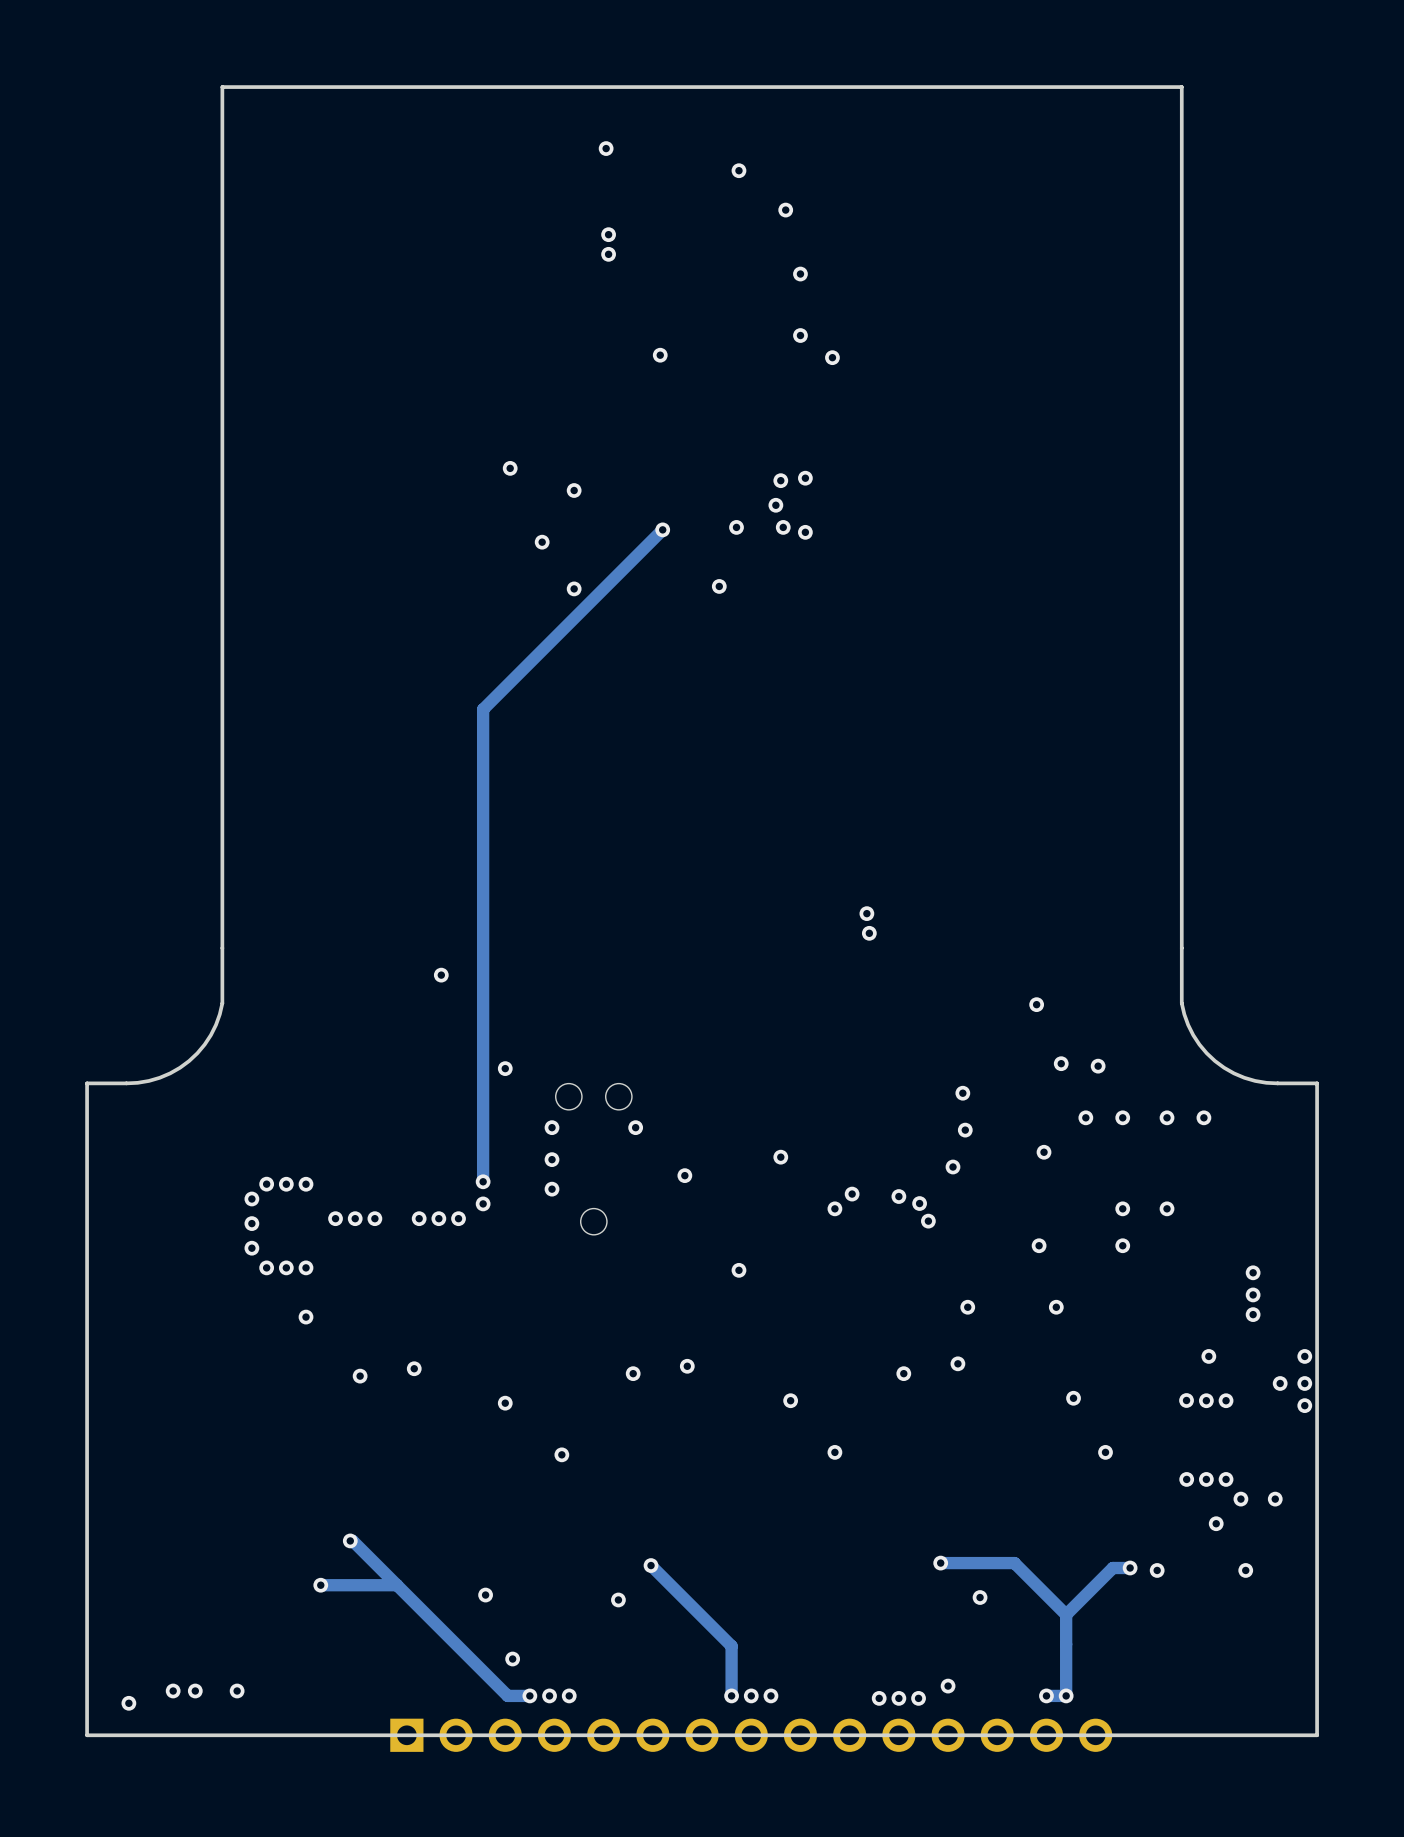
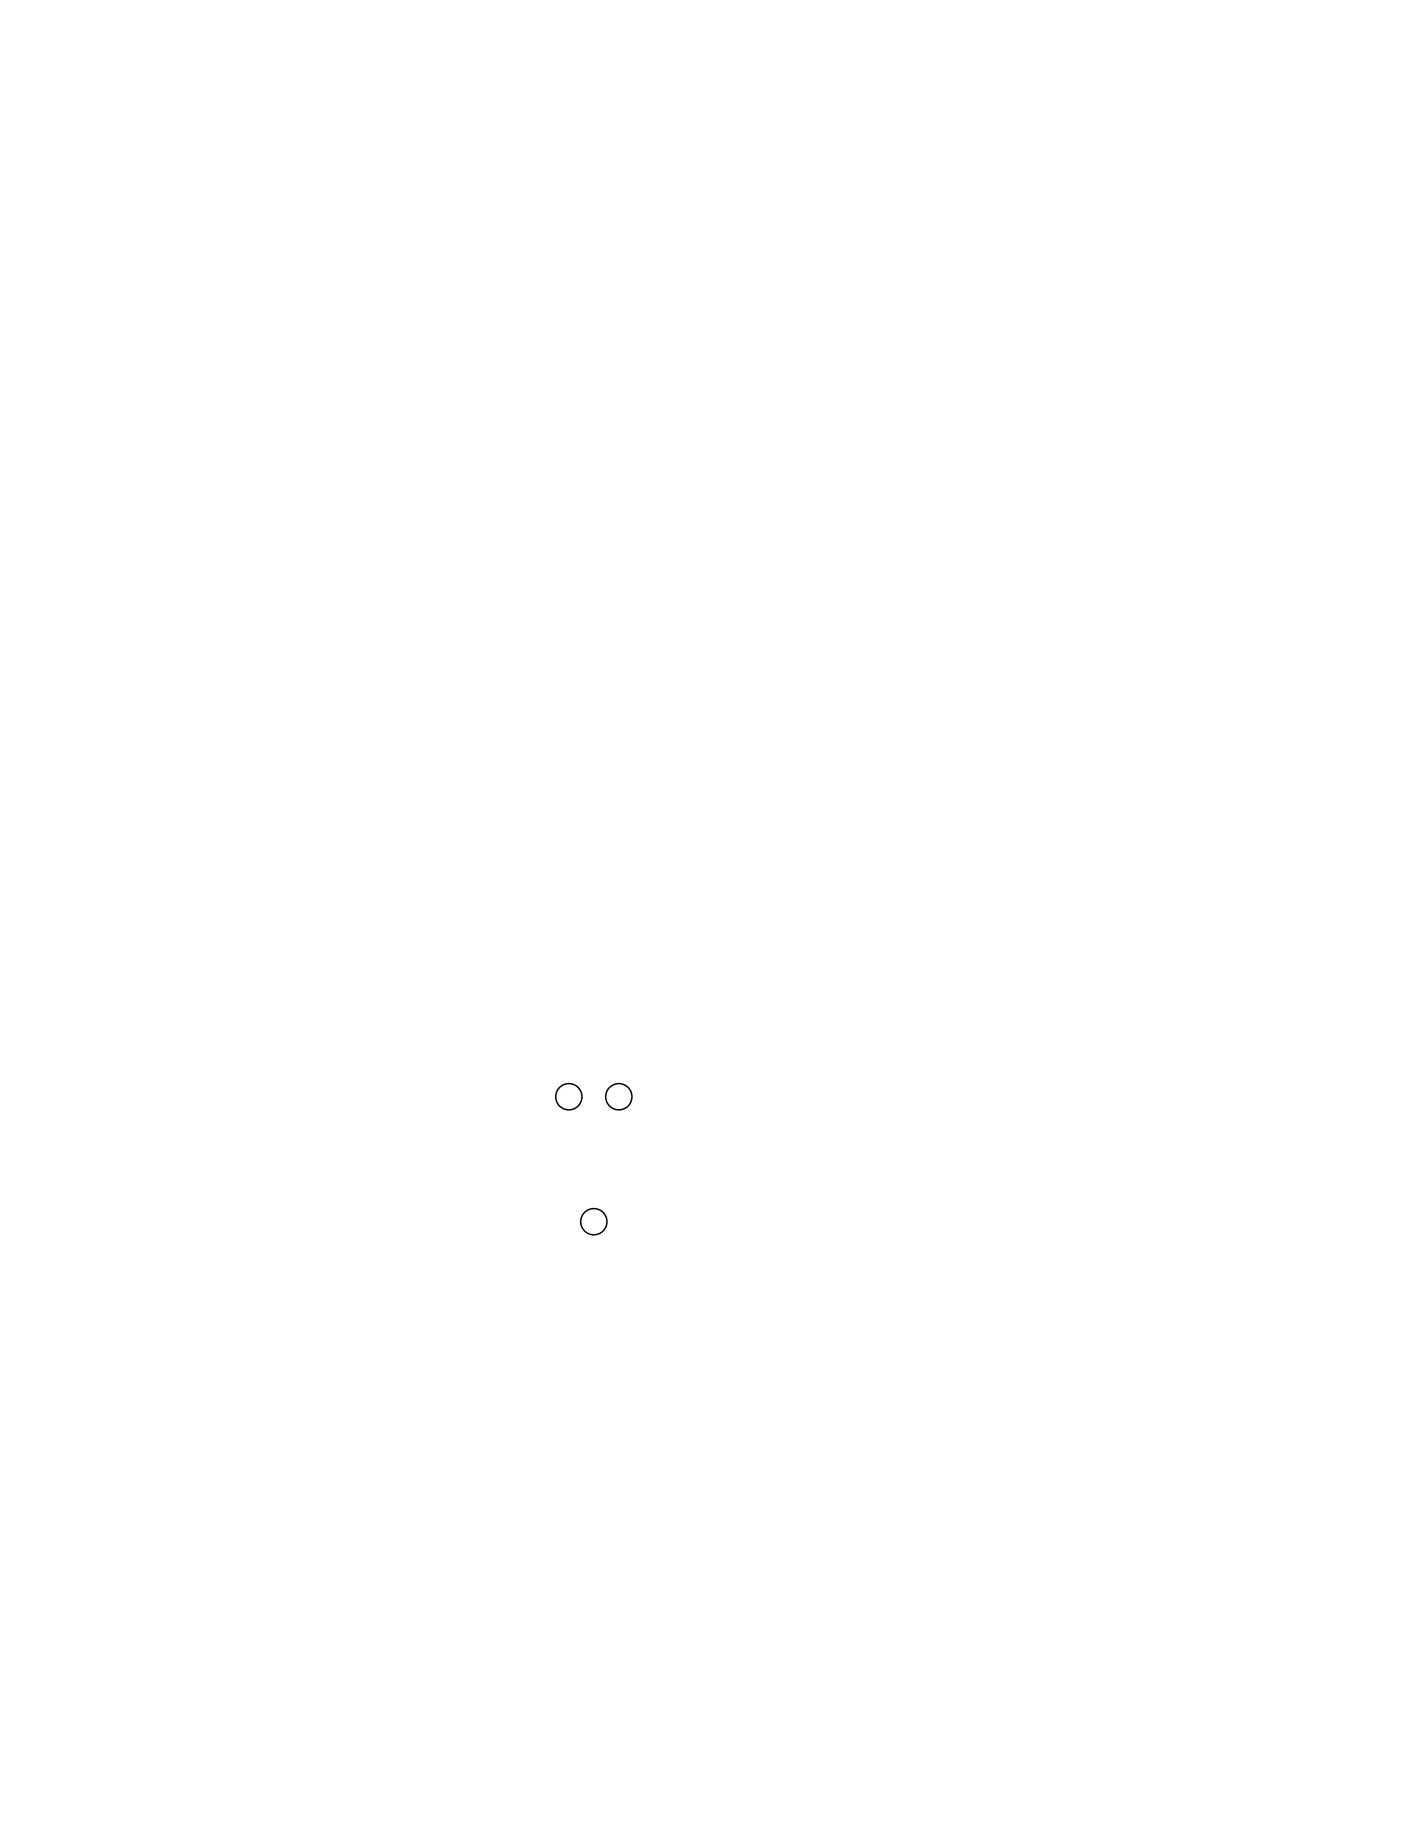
board edge: (1181, 87) (1181, 1003) (1188, 1024) (1199, 1044) (1224, 1067) (1255, 1080) (1277, 1083) (1317, 1083) (1317, 1735) (87, 1735) (87, 1083) (126, 1083) (148, 1080) (180, 1067) (197, 1053) (210, 1035) (222, 1003) (222, 87) (1181, 87) -> none
via: (606, 148) -> none
via: (738, 170) -> none
via: (785, 210) -> none
via: (608, 234) -> none
via: (608, 254) -> none
via: (800, 274) -> none
via: (800, 335) -> none
via: (660, 355) -> none
via: (832, 357) -> none
via: (510, 468) -> none
via: (805, 478) -> none
via: (780, 480) -> none
via: (574, 490) -> none
via: (775, 505) -> none
via: (736, 527) -> none
via: (783, 527) -> none
track: (662, 529) (483, 709) (483, 1181) -> none
via: (662, 529) -> none
via: (805, 532) -> none
via: (542, 542) -> none
via: (719, 586) -> none
via: (574, 588) -> none
via: (866, 913) -> none
via: (869, 933) -> none
via: (441, 975) -> none
via: (1036, 1004) -> none
via: (1061, 1063) -> none
via: (1098, 1066) -> none
via: (505, 1068) -> none
via: (962, 1093) -> none
via: (1085, 1117) -> none
via: (1122, 1117) -> none
via: (1167, 1117) -> none
via: (1203, 1117) -> none
via: (552, 1127) -> none
via: (635, 1127) -> none
via: (965, 1130) -> none
via: (1044, 1152) -> none
via: (780, 1157) -> none
via: (552, 1159) -> none
via: (952, 1167) -> none
via: (684, 1175) -> none
via: (483, 1181) -> none
via: (266, 1184) -> none
via: (286, 1184) -> none
via: (306, 1184) -> none
via: (552, 1189) -> none
via: (852, 1194) -> none
via: (898, 1196) -> none
via: (251, 1198) -> none
via: (483, 1203) -> none
via: (919, 1203) -> none
via: (834, 1208) -> none
via: (1122, 1208) -> none
via: (1167, 1208) -> none
via: (335, 1218) -> none
via: (355, 1218) -> none
via: (374, 1218) -> none
via: (419, 1218) -> none
via: (438, 1218) -> none
via: (458, 1218) -> none
via: (928, 1221) -> none
via: (251, 1223) -> none
via: (1039, 1245) -> none
via: (1122, 1245) -> none
via: (251, 1248) -> none
via: (266, 1267) -> none
via: (286, 1267) -> none
via: (306, 1267) -> none
via: (738, 1270) -> none
via: (1253, 1272) -> none
via: (1253, 1294) -> none
via: (967, 1307) -> none
via: (1056, 1307) -> none
via: (1253, 1314) -> none
via: (306, 1317) -> none
via: (1208, 1356) -> none
via: (1304, 1356) -> none
via: (957, 1363) -> none
via: (687, 1366) -> none
via: (414, 1368) -> none
via: (633, 1373) -> none
via: (903, 1373) -> none
via: (360, 1376) -> none
via: (1280, 1383) -> none
via: (1304, 1383) -> none
via: (1073, 1398) -> none
via: (790, 1400) -> none
via: (1186, 1400) -> none
via: (1206, 1400) -> none
via: (1226, 1400) -> none
via: (505, 1403) -> none
via: (1304, 1405) -> none
via: (834, 1452) -> none
via: (1105, 1452) -> none
via: (561, 1454) -> none
via: (1186, 1479) -> none
via: (1206, 1479) -> none
via: (1226, 1479) -> none
via: (1240, 1499) -> none
via: (1275, 1499) -> none
via: (1216, 1523) -> none
track: (350, 1540) (352, 1540) (507, 1695) (529, 1695) -> none
via: (350, 1540) -> none
track: (940, 1563) (1014, 1563) (1066, 1614) -> none
via: (940, 1563) -> none
track: (651, 1565) (731, 1646) (731, 1695) -> none
via: (651, 1565) -> none
track: (1130, 1568) (1112, 1568) (1066, 1614) -> none
via: (1130, 1568) -> none
via: (1157, 1570) -> none
via: (1245, 1570) -> none
via: (320, 1585) -> none
track: (397, 1585) (320, 1585) -> none
via: (485, 1595) -> none
via: (980, 1597) -> none
via: (618, 1599) -> none
track: (1066, 1614) (1066, 1695) (1046, 1695) -> none
via: (512, 1659) -> none
via: (948, 1686) -> none
via: (173, 1691) -> none
via: (195, 1691) -> none
via: (237, 1691) -> none
via: (529, 1695) -> none
via: (549, 1695) -> none
via: (569, 1695) -> none
via: (731, 1695) -> none
via: (751, 1695) -> none
via: (770, 1695) -> none
via: (1046, 1695) -> none
via: (1066, 1695) -> none
via: (879, 1698) -> none
via: (898, 1698) -> none
via: (918, 1698) -> none
via: (128, 1703) -> none
part: (751, 1735) -> none

